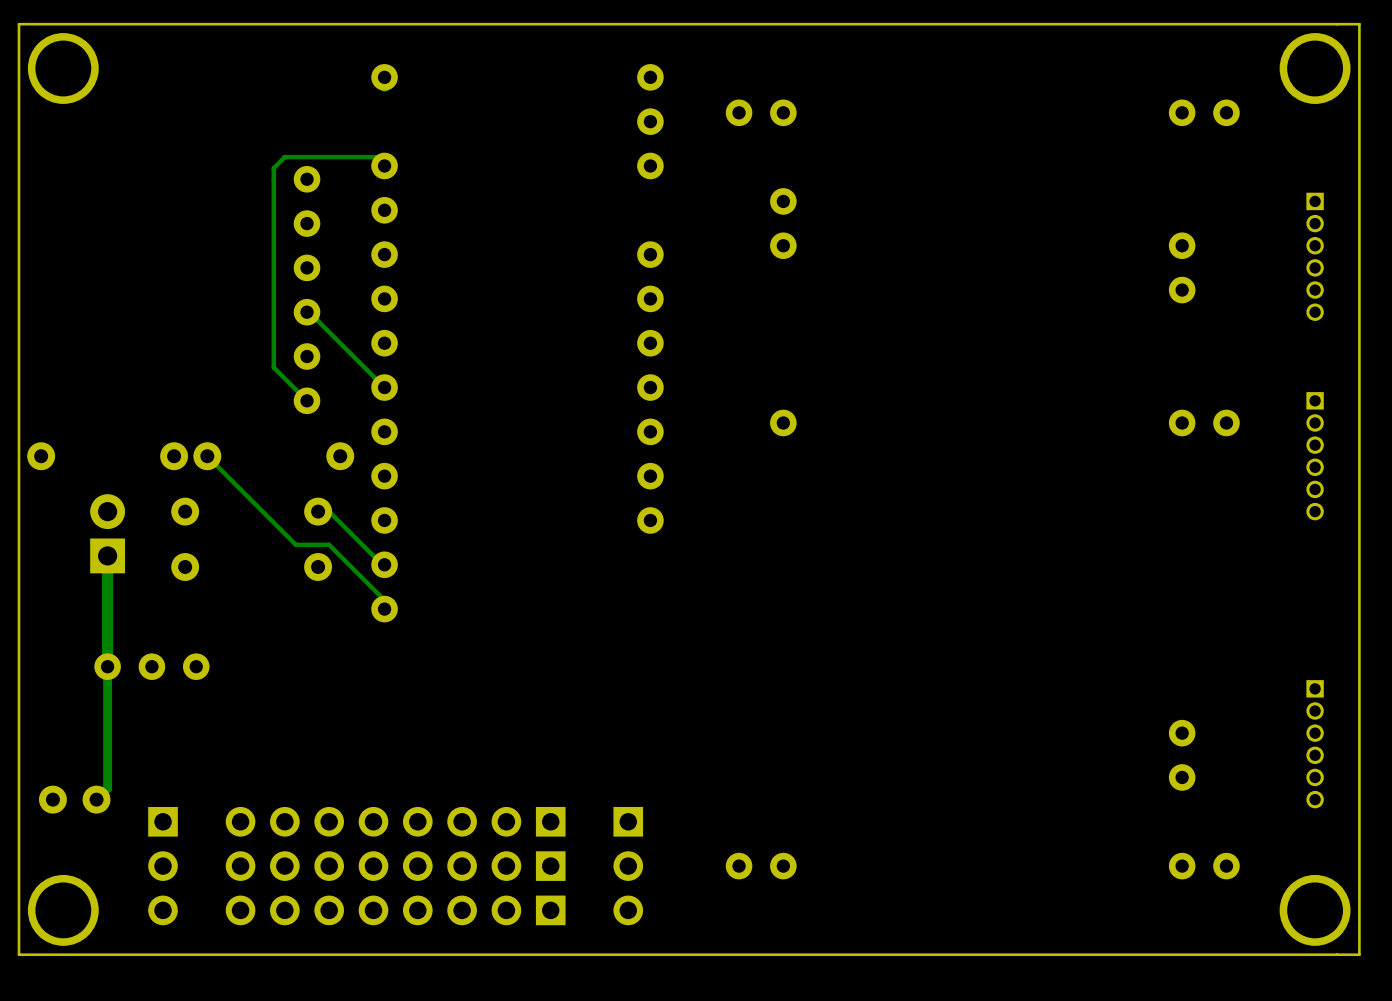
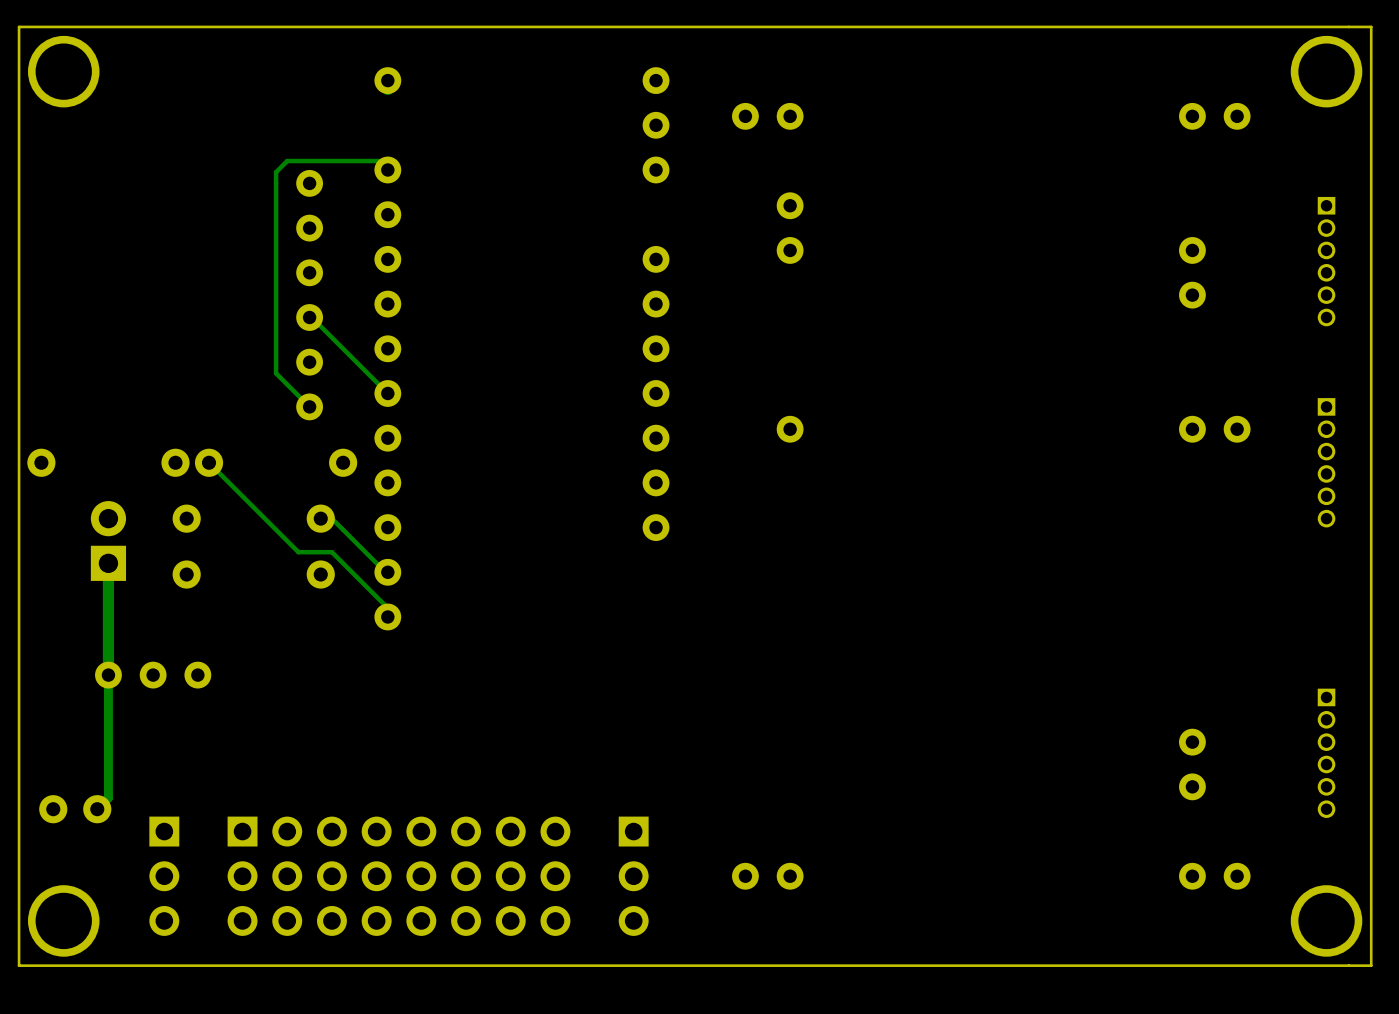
part: (395, 821) -> none
part footprint: [225, 851, 566, 881] -> [227, 816, 571, 936]
part: (395, 910) -> none

